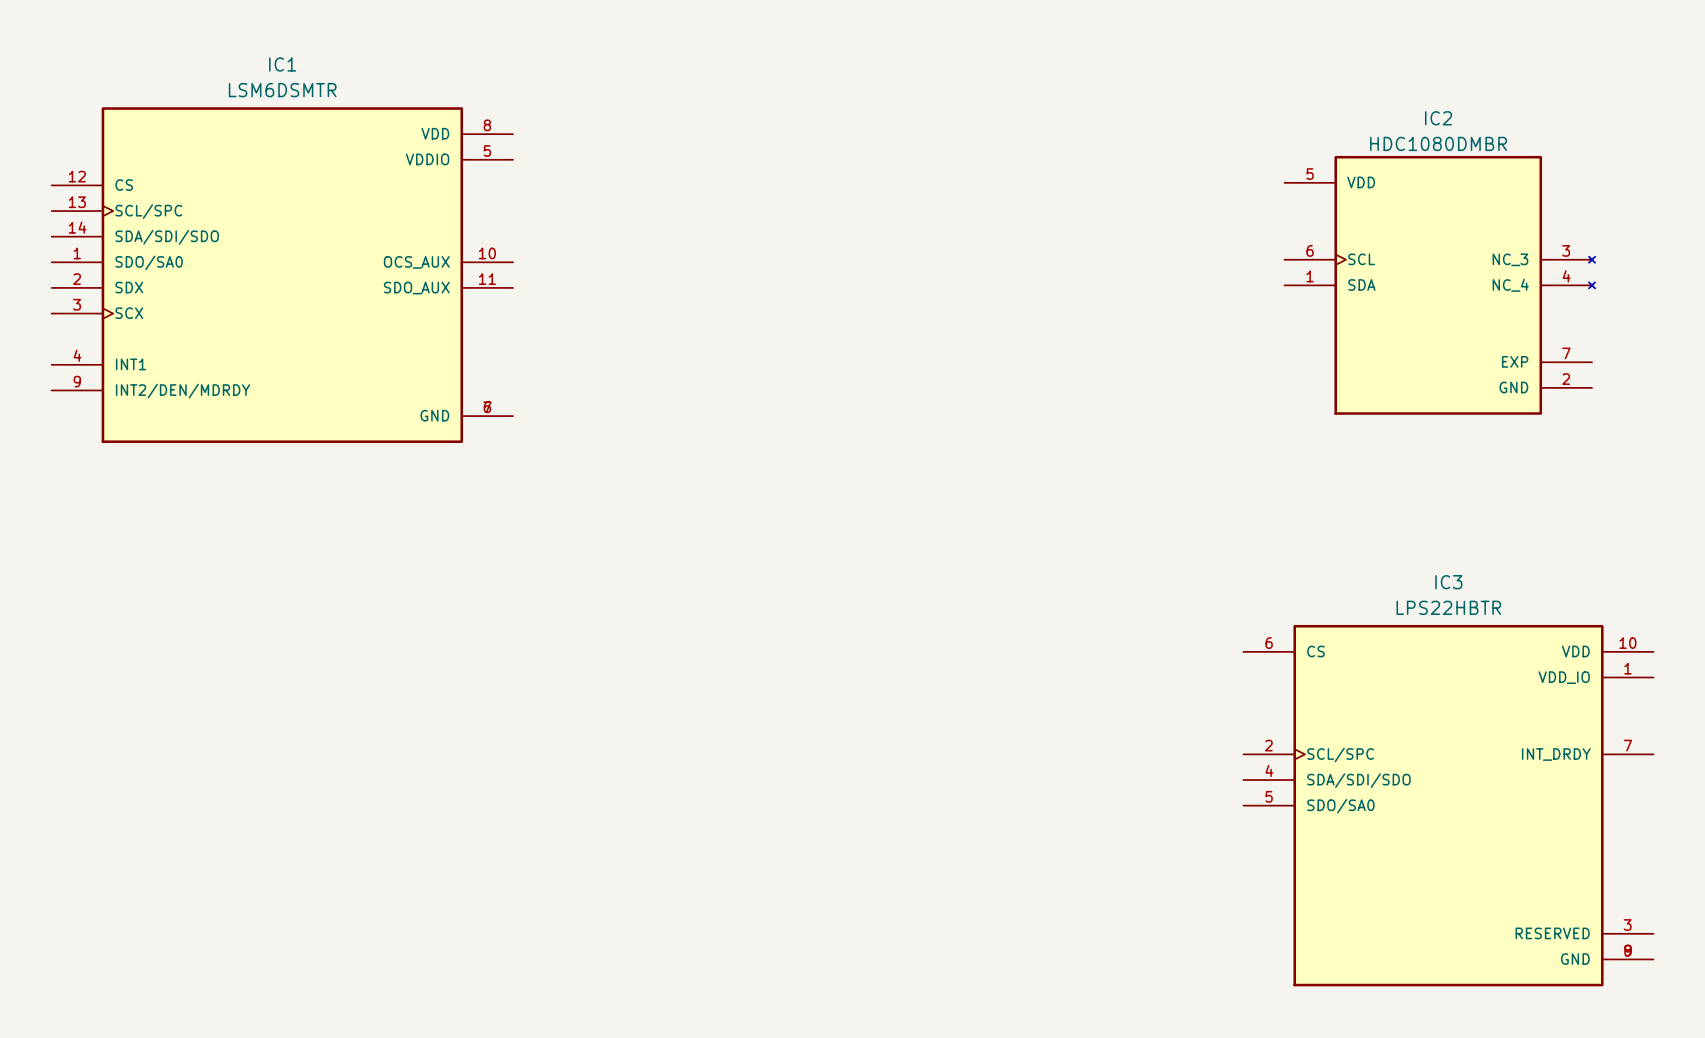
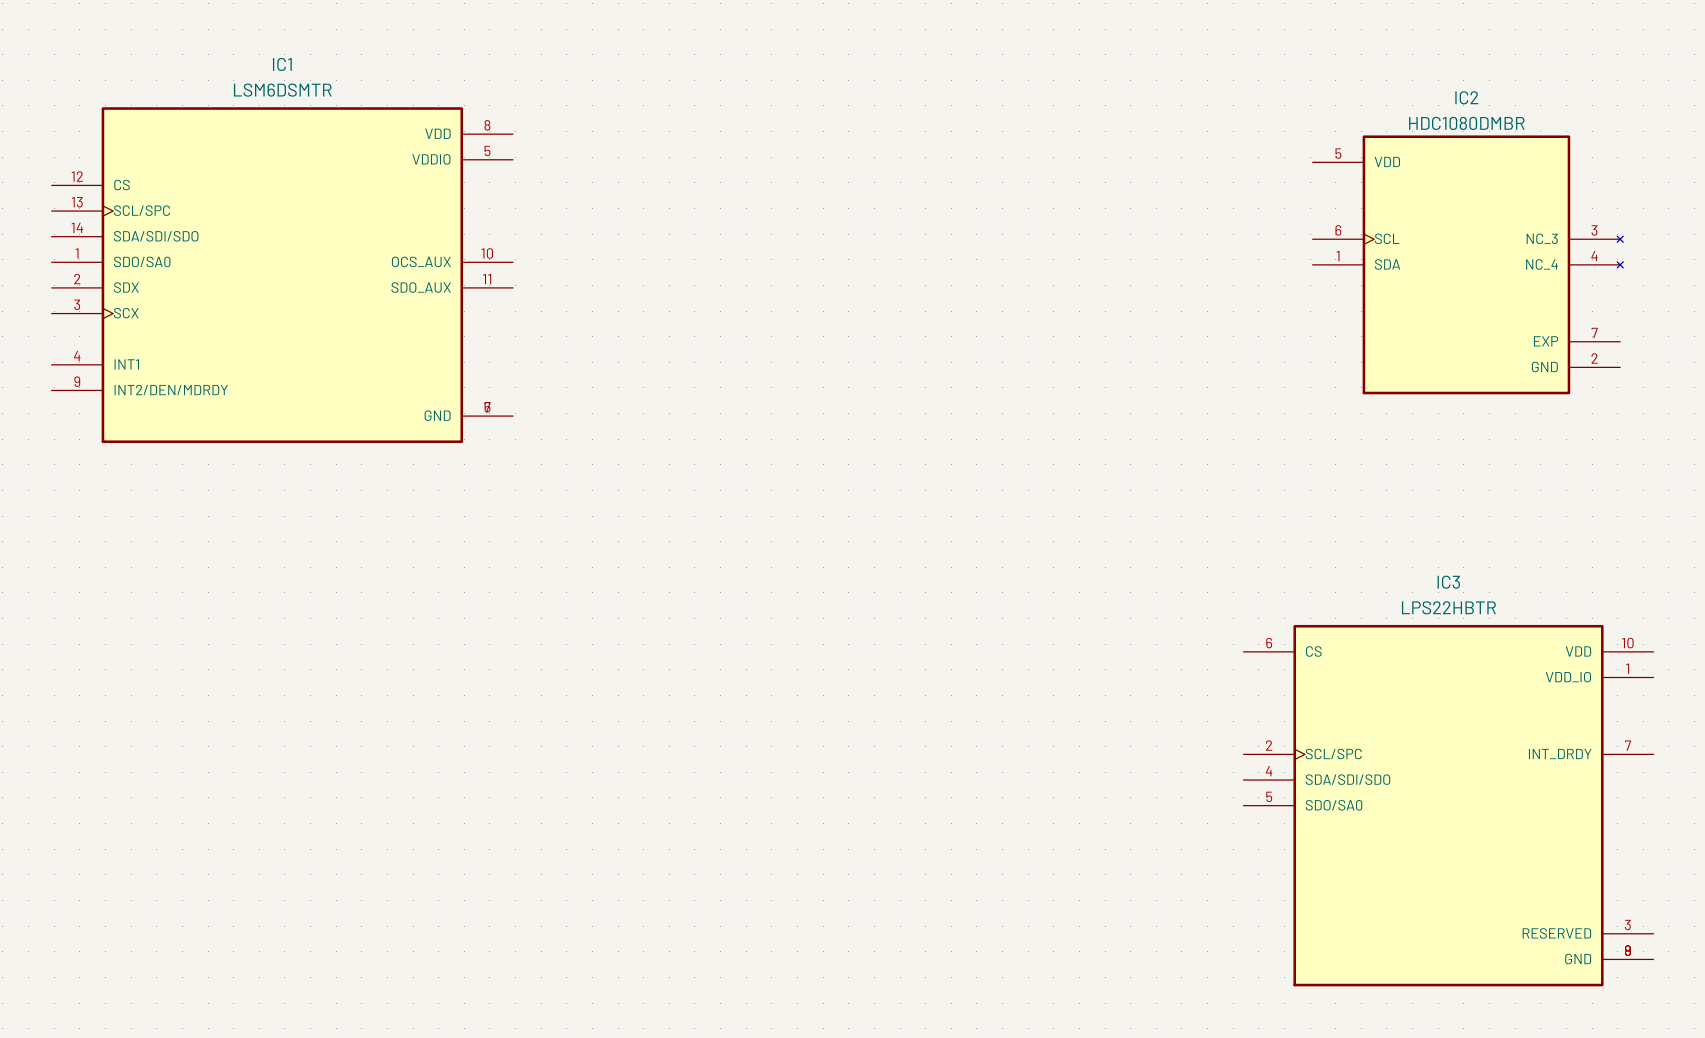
IC2 position: (1439, 285) -> (1467, 264)

